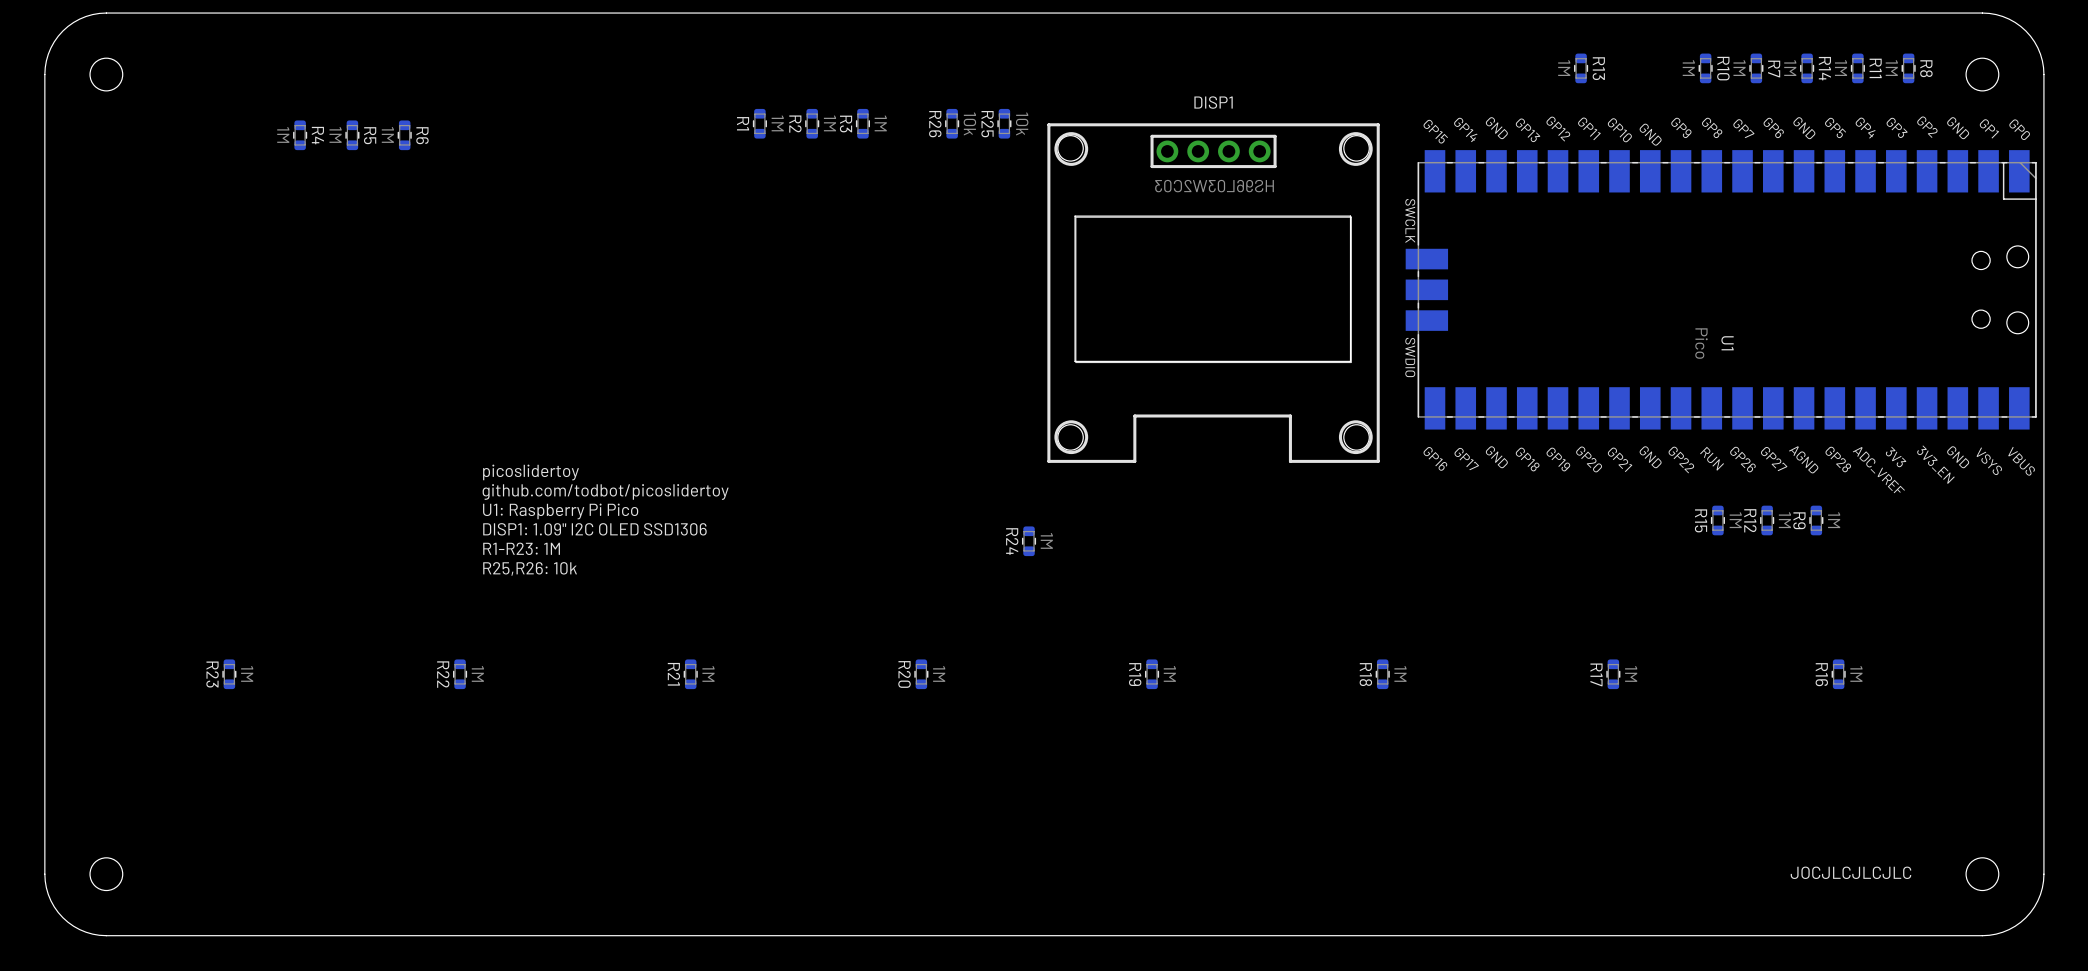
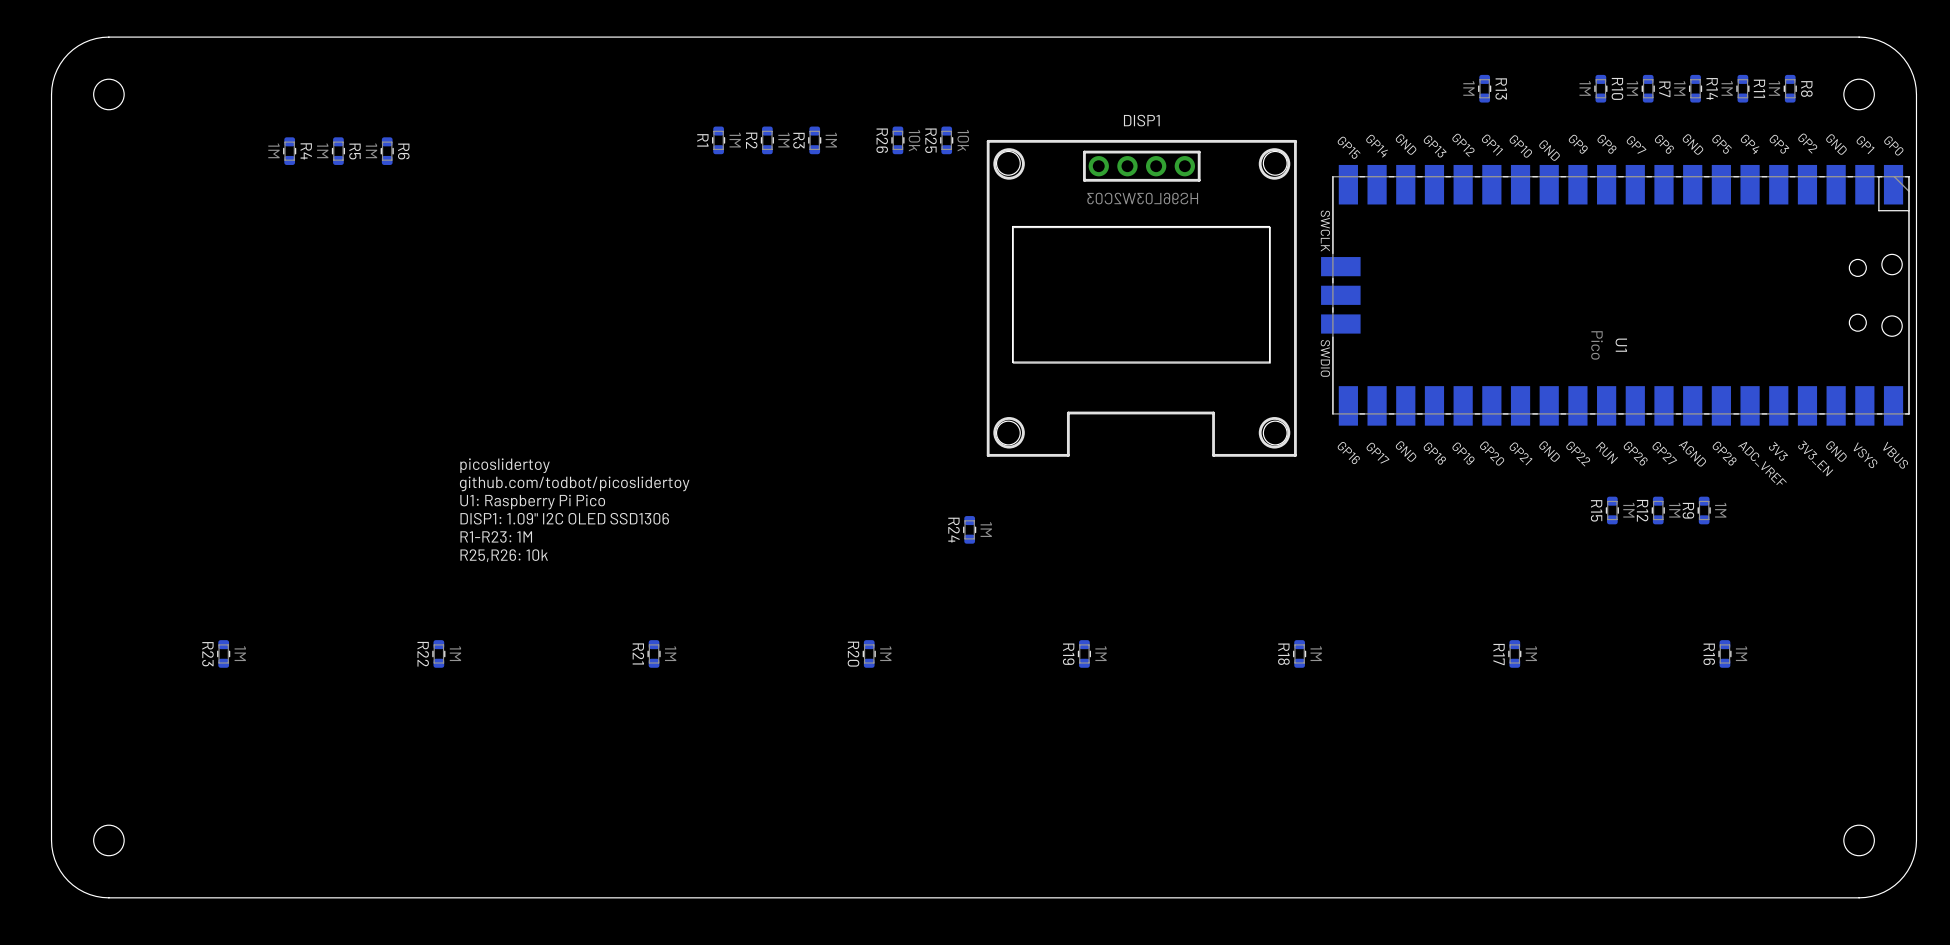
text: JOCJLCJLCJLC (1850, 872) -> none

